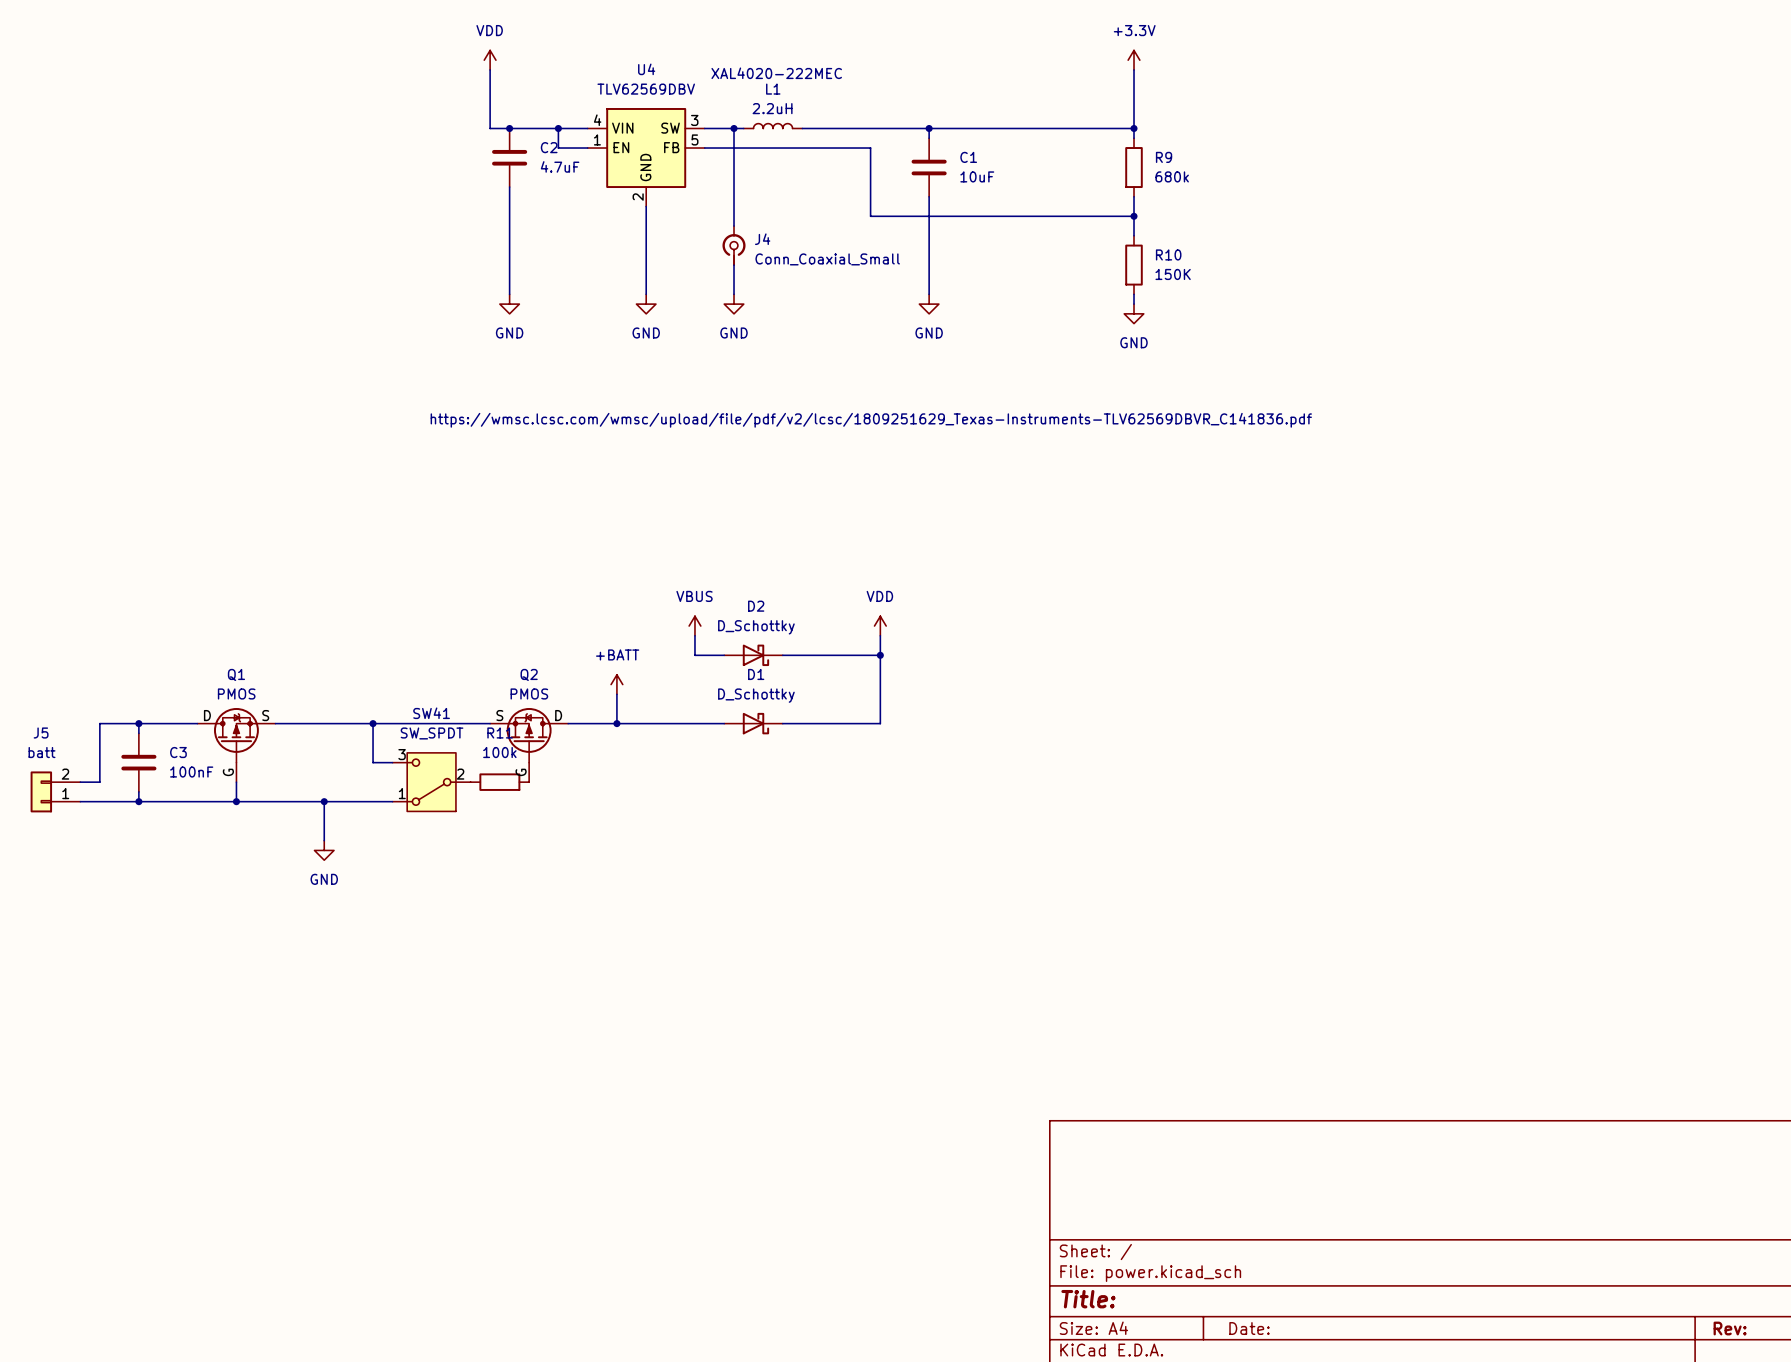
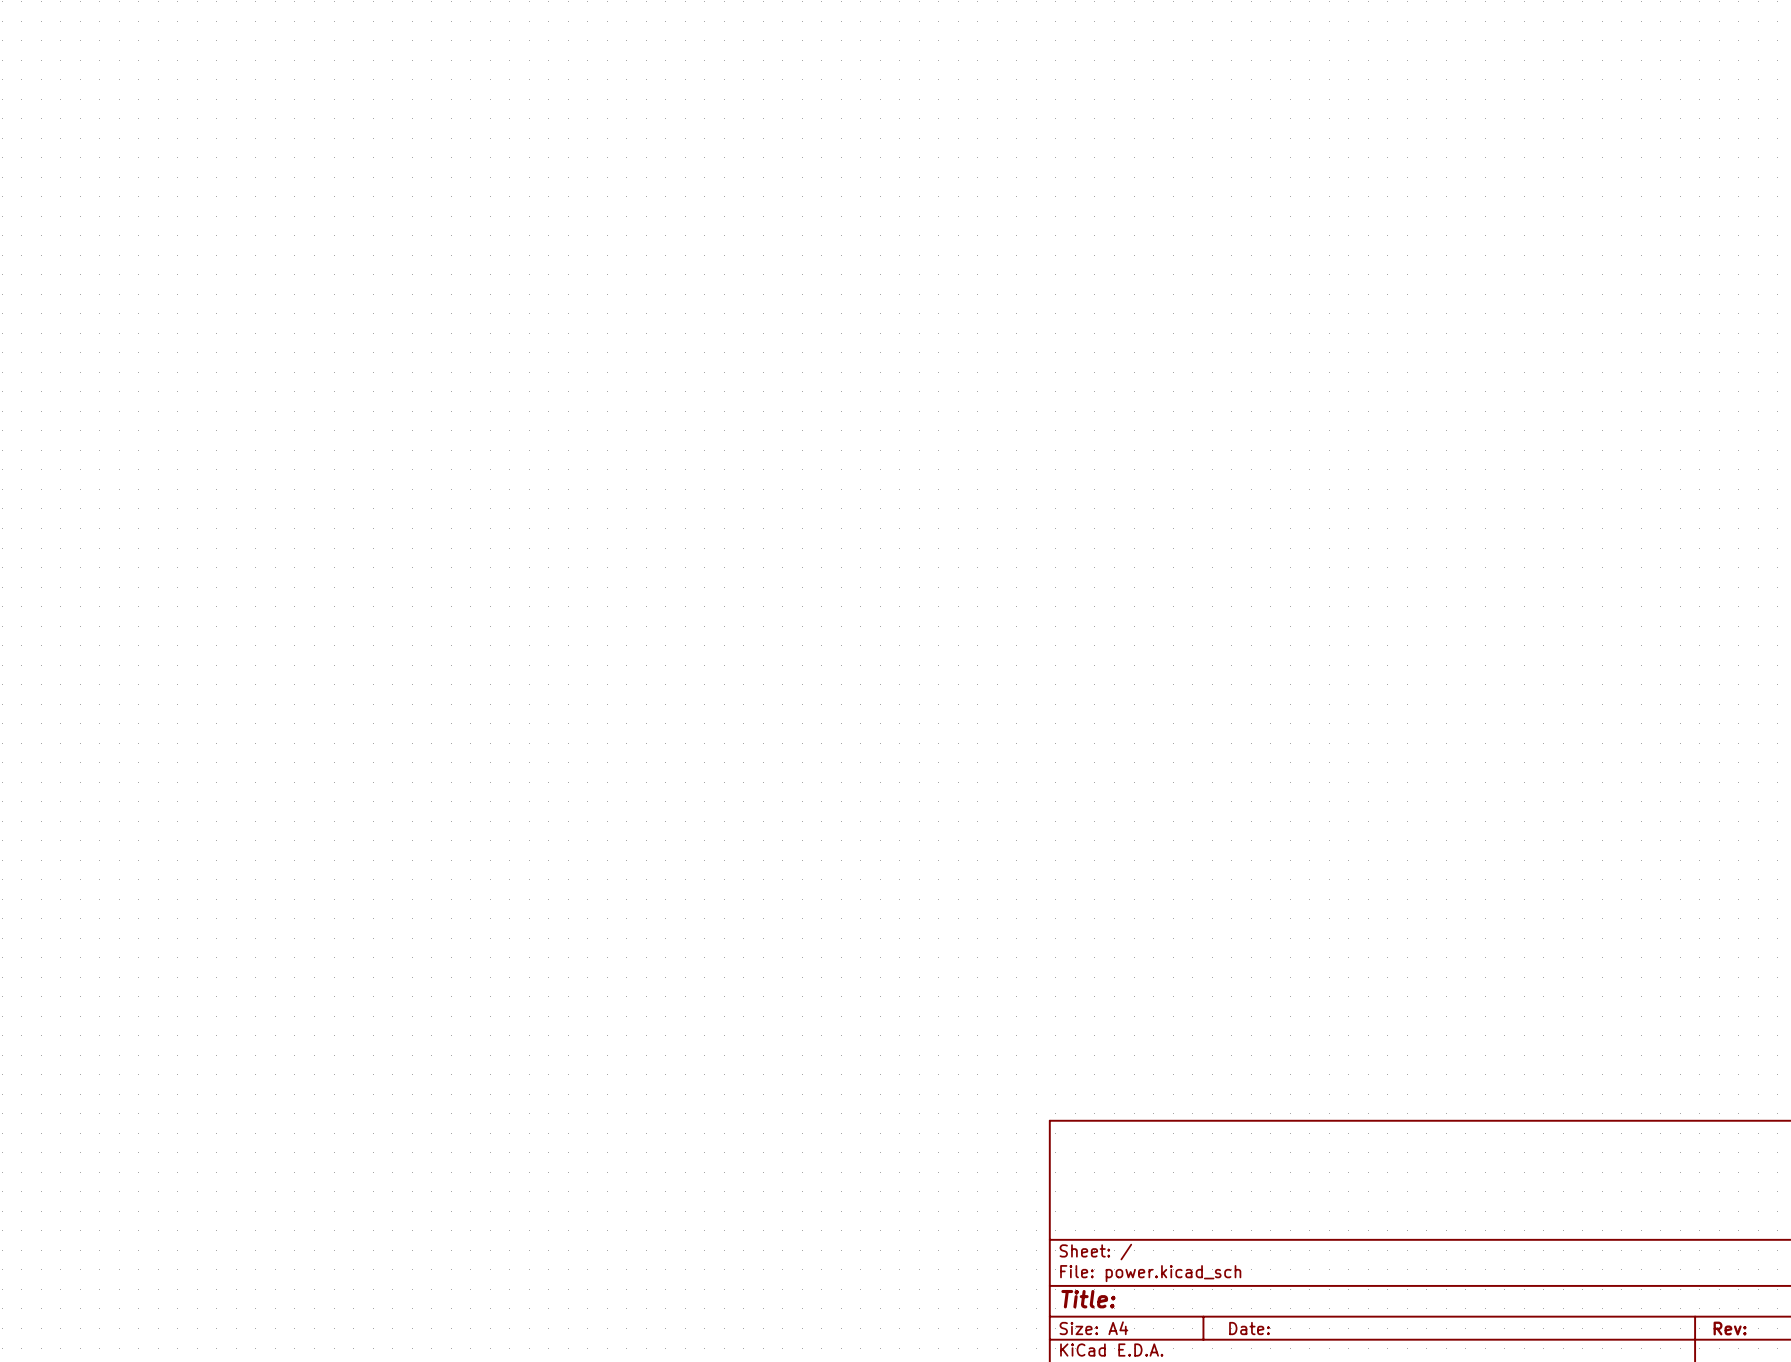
power symbol: VDD (490, 60) -> none
power symbol: +3.3V (1134, 60) -> none
wire: (490, 69) (490, 128) (587, 128) -> none
wire: (1134, 69) (1134, 138) -> none
L1: 2.2uH (773, 126) -> none
junction: (509, 128) -> none
wire: (558, 128) (558, 148) (587, 148) -> none
junction: (558, 128) -> none
wire: (704, 128) (743, 128) -> none
wire: (734, 128) (734, 226) -> none
junction: (734, 128) -> none
wire: (802, 128) (1134, 128) -> none
wire: (929, 128) (929, 138) -> none
junction: (929, 128) -> none
junction: (1134, 128) -> none
wire: (704, 148) (870, 148) (870, 216) (1134, 216) -> none
C2: 4.7uF (509, 157) -> none
U4: TLV62569DBV (646, 157) -> none
C1: 10uF (929, 167) -> none
R9: 680k (1134, 167) -> none
wire: (509, 187) (509, 294) -> none
wire: (929, 196) (929, 294) -> none
wire: (1134, 196) (1134, 235) -> none
wire: (646, 206) (646, 294) -> none
junction: (1134, 216) -> none
J4: Conn_Coaxial_Small (734, 245) -> none
wire: (734, 265) (734, 294) -> none
R10: 150K (1134, 265) -> none
wire: (1134, 294) (1134, 304) -> none
power symbol: GND (509, 304) -> none
power symbol: GND (646, 304) -> none
power symbol: GND (734, 304) -> none
power symbol: GND (929, 304) -> none
power symbol: GND (1134, 313) -> none
text: https://wmsc.lcsc.com/wmsc/upload/file/pdf/v2/lcsc/1809251629_Texas-Instruments-TLV62569DBVR_C141836.pdf (871, 420) -> none
power symbol: VBUS (694, 626) -> none
power symbol: VDD (880, 626) -> none
wire: (694, 635) (694, 655) (724, 655) -> none
wire: (880, 635) (880, 723) (782, 723) -> none
D2: D_Schottky (753, 655) -> none
wire: (782, 655) (880, 655) -> none
junction: (880, 655) -> none
power symbol: +BATT (616, 684) -> none
wire: (616, 694) (616, 723) -> none
wire: (138, 723) (138, 733) -> none
junction: (138, 723) -> none
wire: (197, 723) (99, 723) (99, 782) (80, 782) -> none
wire: (275, 723) (490, 723) -> none
wire: (373, 723) (373, 762) (392, 762) -> none
junction: (373, 723) -> none
wire: (568, 723) (724, 723) -> none
junction: (616, 723) -> none
D1: D_Schottky (753, 723) -> none
Q1: PMOS (236, 745) -> none
Q2: PMOS (529, 745) -> none
C3: 100nF (138, 762) -> none
wire: (236, 782) (236, 801) -> none
SW41: SW_SPDT (431, 782) -> none
R11: 100k (499, 782) -> none
J5: batt (55, 791) -> none
wire: (138, 791) (138, 801) -> none
wire: (80, 801) (392, 801) -> none
junction: (138, 801) -> none
junction: (236, 801) -> none
wire: (324, 801) (324, 840) -> none
junction: (324, 801) -> none
power symbol: GND (324, 850) -> none

